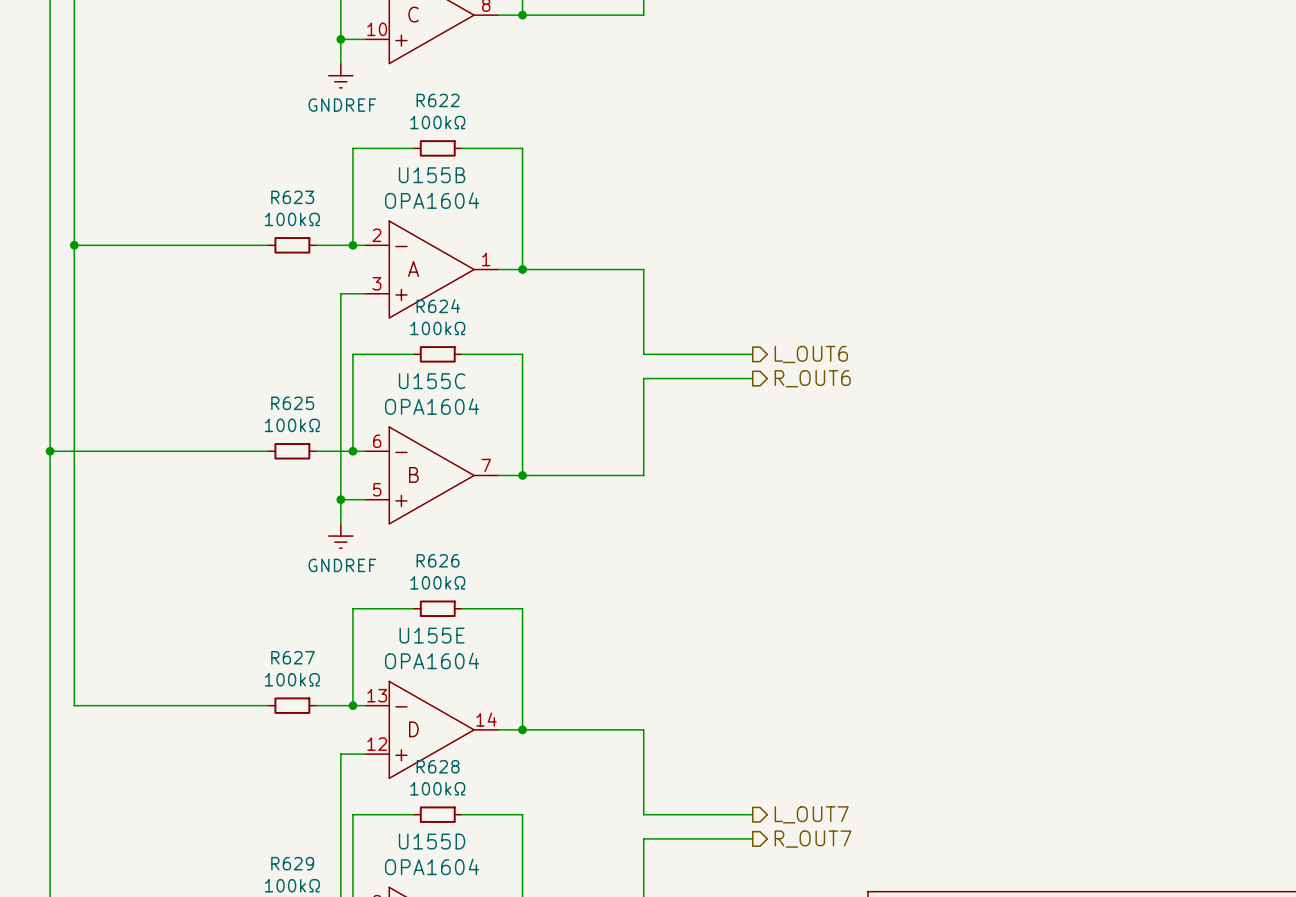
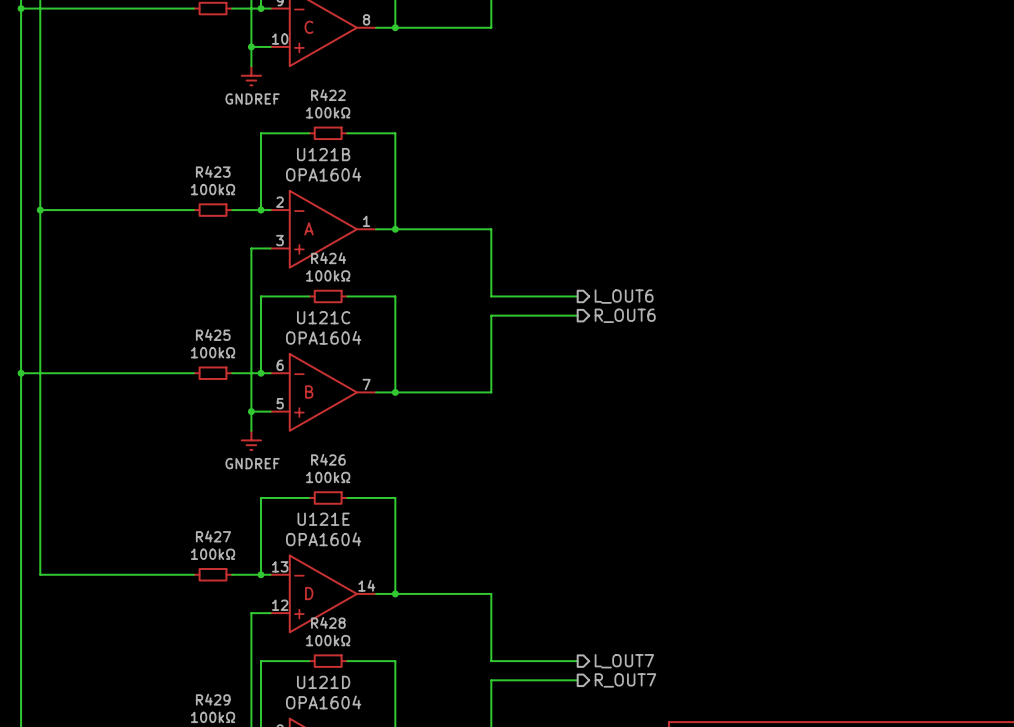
R622 name: R622 (438, 100) -> R422 (328, 95)
U155B name: U155B (432, 175) -> U121B (323, 154)
R623 name: R623 (292, 197) -> R423 (213, 171)
R624 name: R624 (438, 306) -> R424 (328, 258)
U155C name: U155C (432, 381) -> U121C (323, 317)
R625 name: R625 (292, 403) -> R425 (213, 335)
R626 name: R626 (438, 560) -> R426 (328, 459)
U155E name: U155E (432, 635) -> U121E (323, 519)
R627 name: R627 (292, 657) -> R427 (213, 536)
R628 name: R628 (438, 766) -> R428 (328, 622)
U155D name: U155D (432, 841) -> U121D (323, 682)
R629 name: R629 (292, 863) -> R429 (213, 699)

